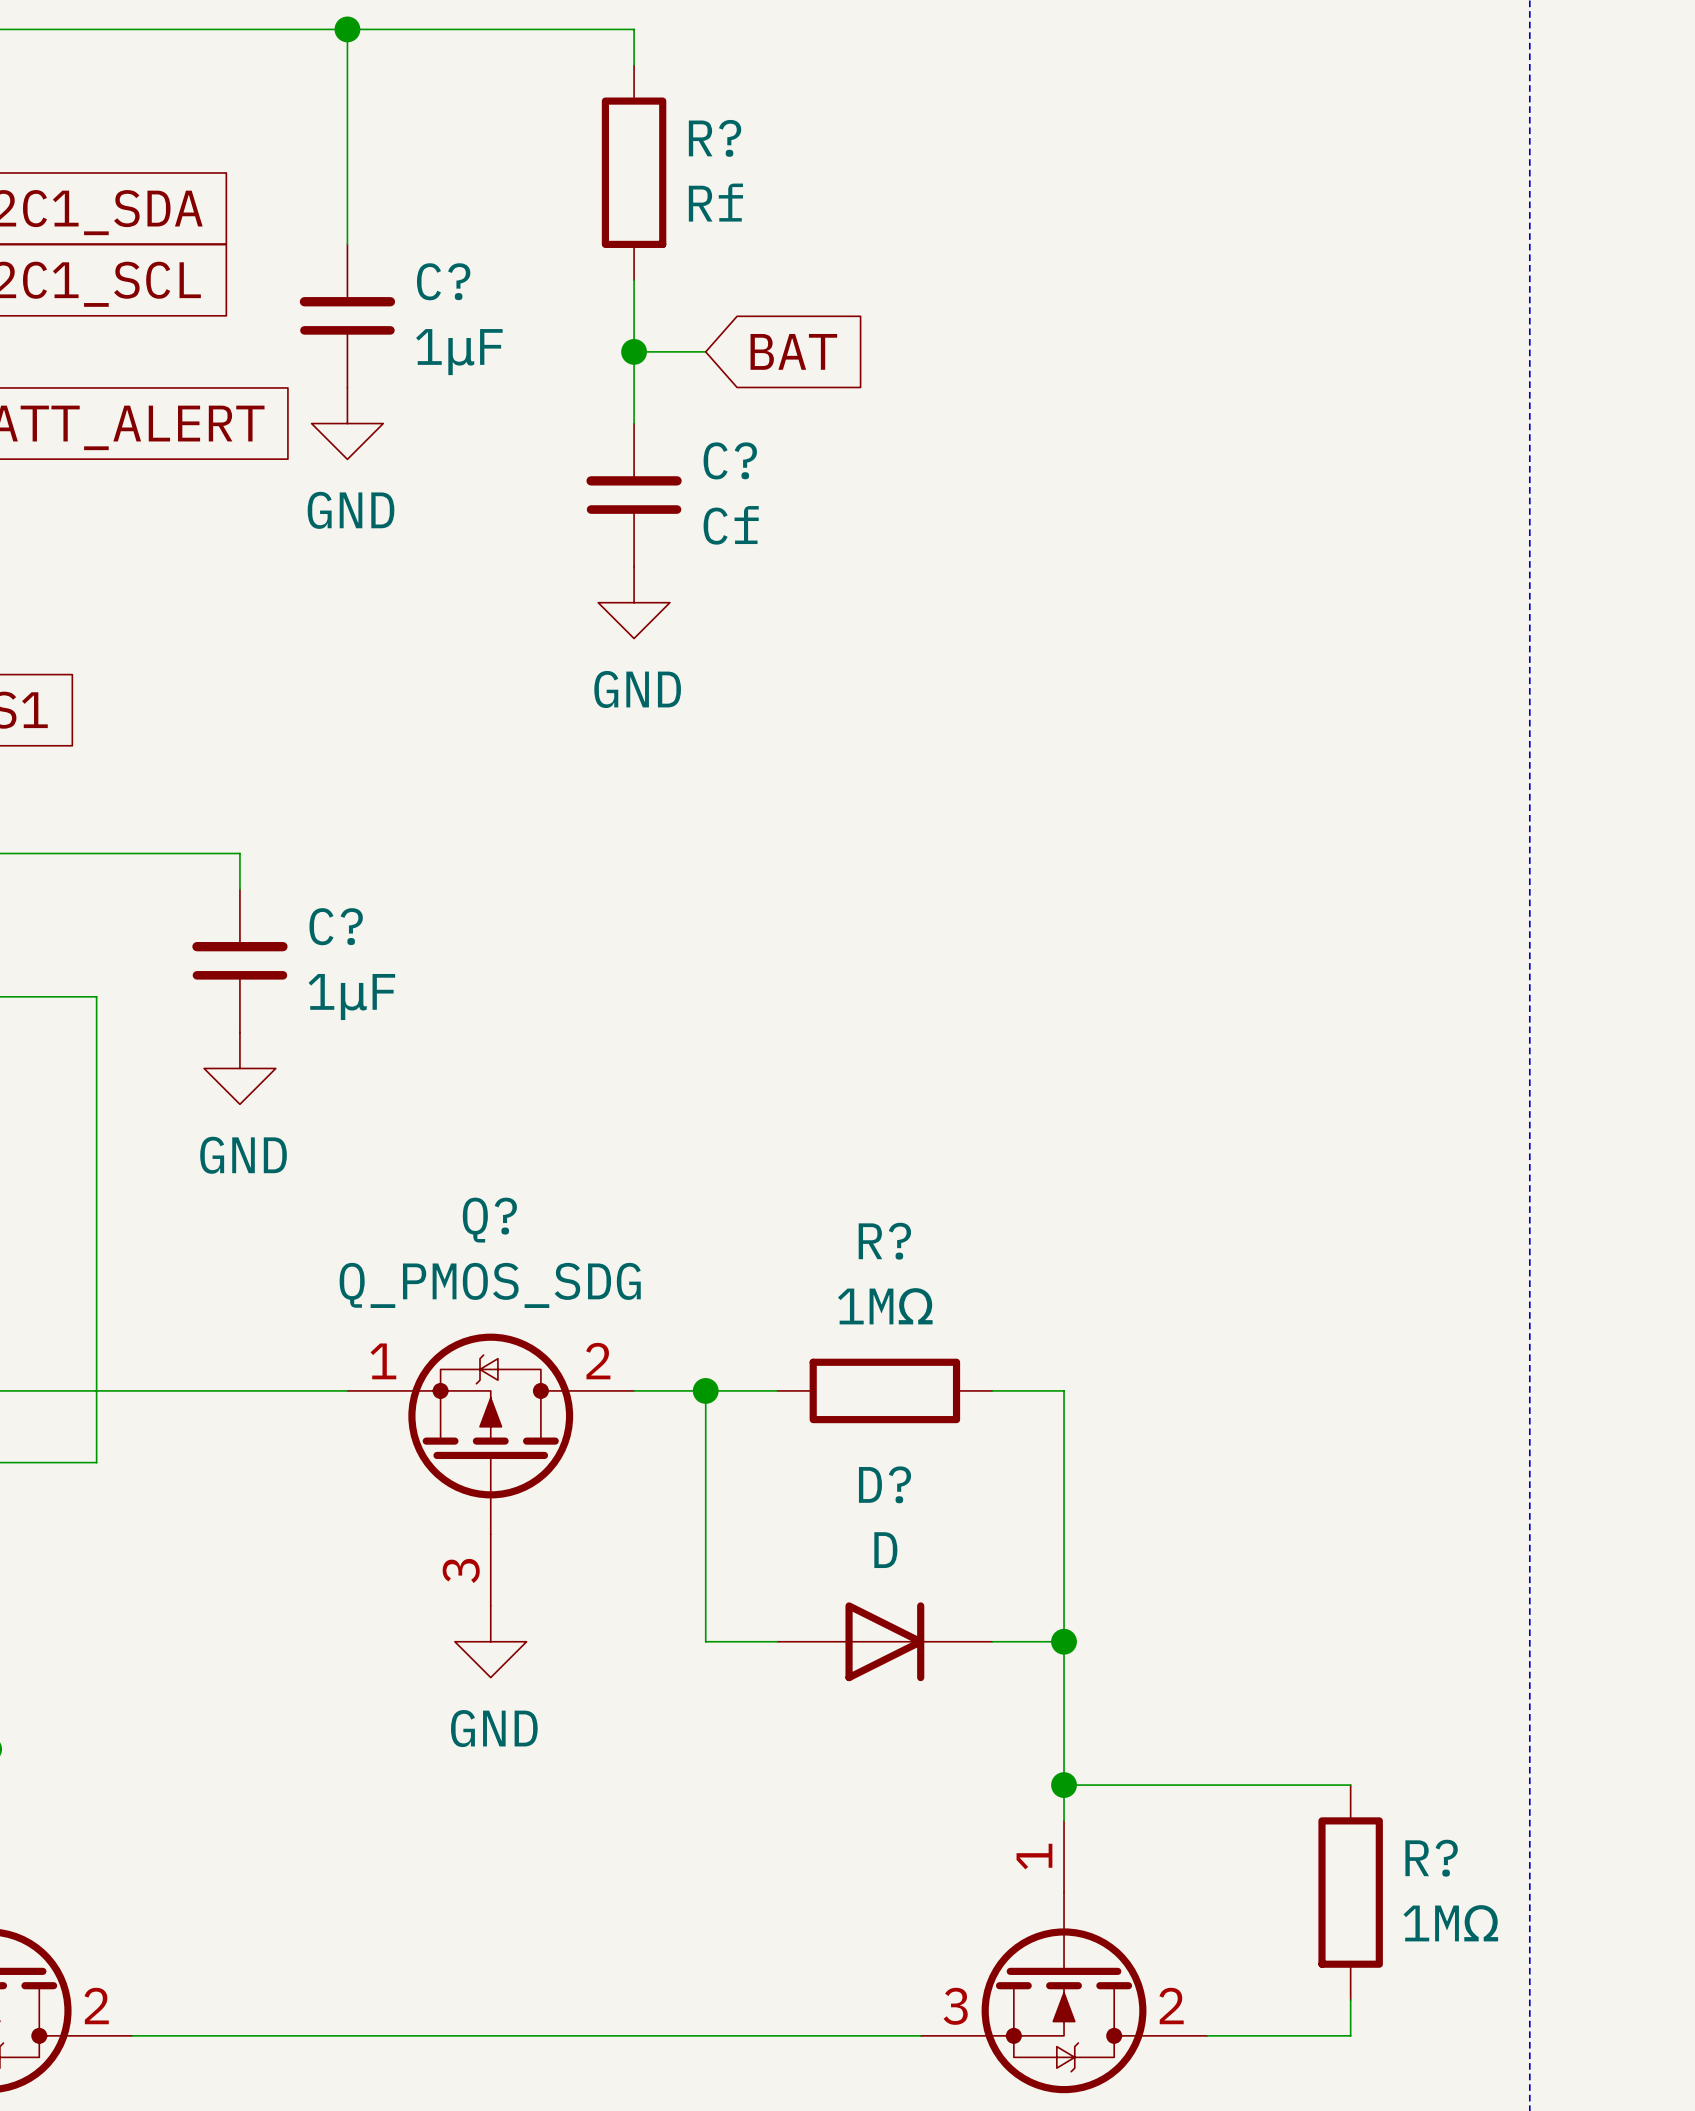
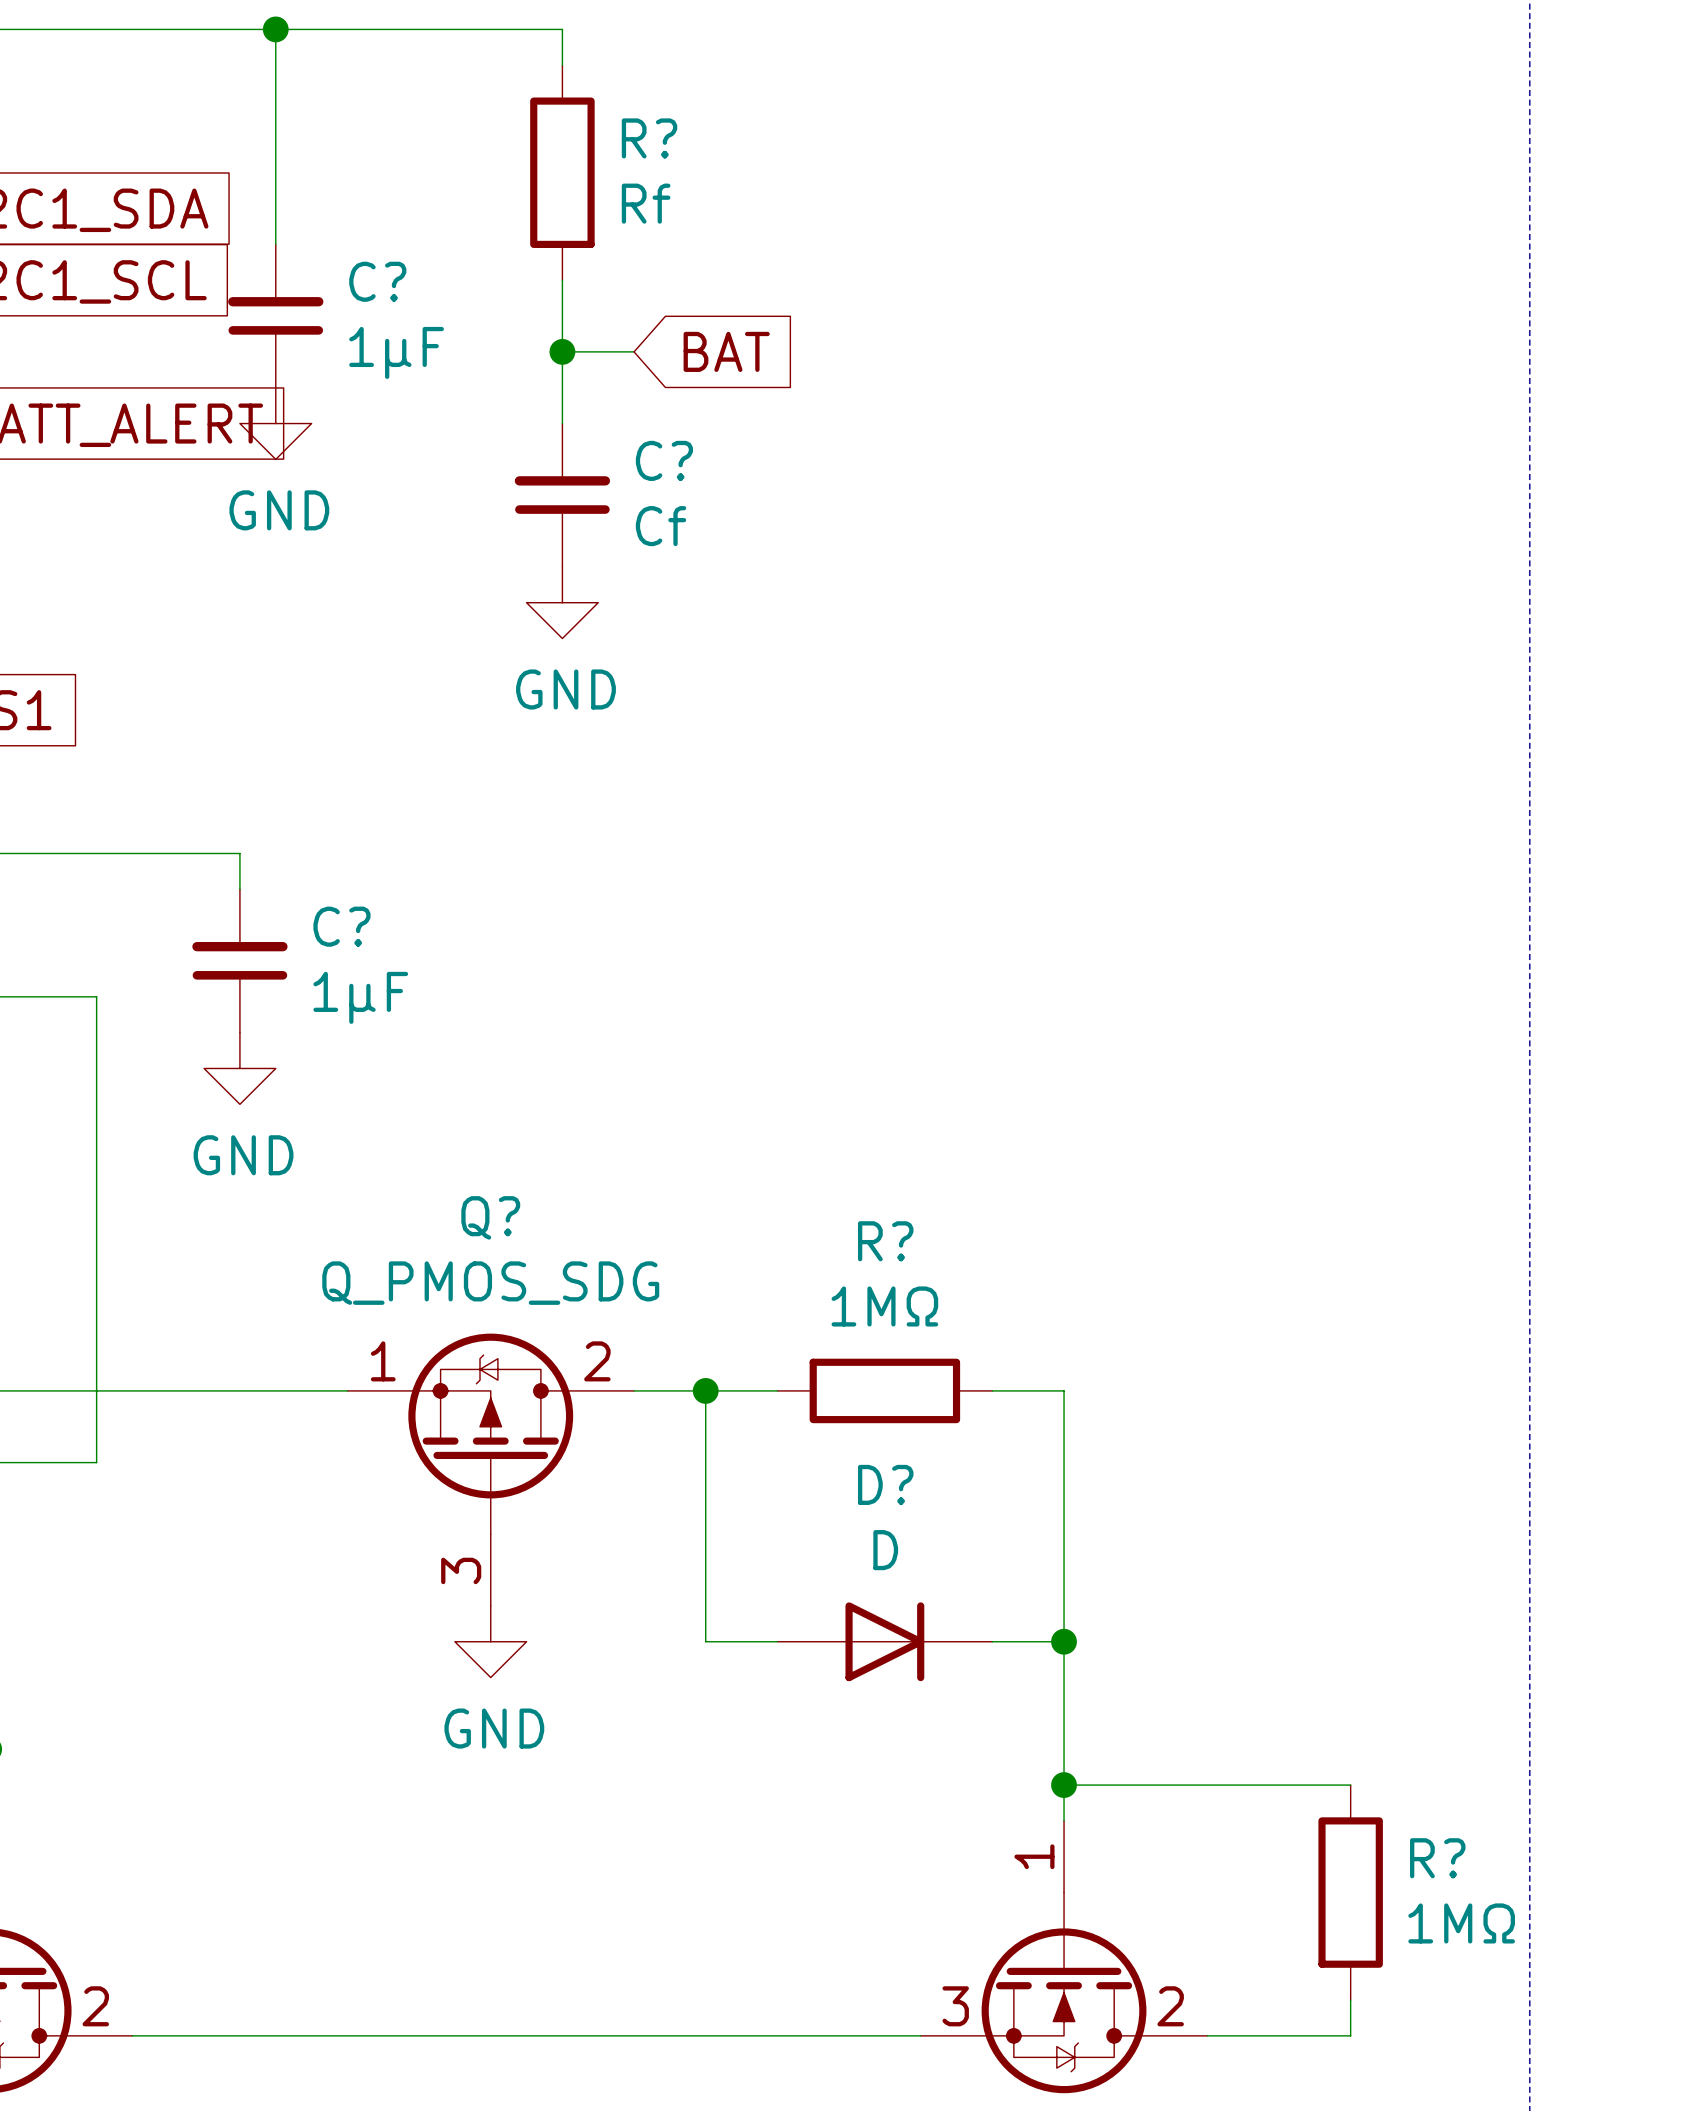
wire: (347, 29) (347, 244) -> (275, 29) (275, 244)
junction position: (347, 29) -> (275, 29)
wire: (562, 29) (634, 29) (634, 65) -> (562, 29) (562, 65)
R? position: (634, 172) -> (562, 172)
wire: (634, 280) (634, 423) -> (562, 280) (562, 423)
C? position: (347, 316) -> (275, 316)
wire: (634, 351) (705, 351) -> (634, 351) (562, 351)
junction position: (634, 351) -> (562, 351)
global label position: BAT (793, 351) -> BAT (726, 351)
power symbol position: GND (347, 423) -> GND (275, 423)
C? position: (634, 495) -> (562, 495)
power symbol position: GND (634, 602) -> GND (562, 602)

